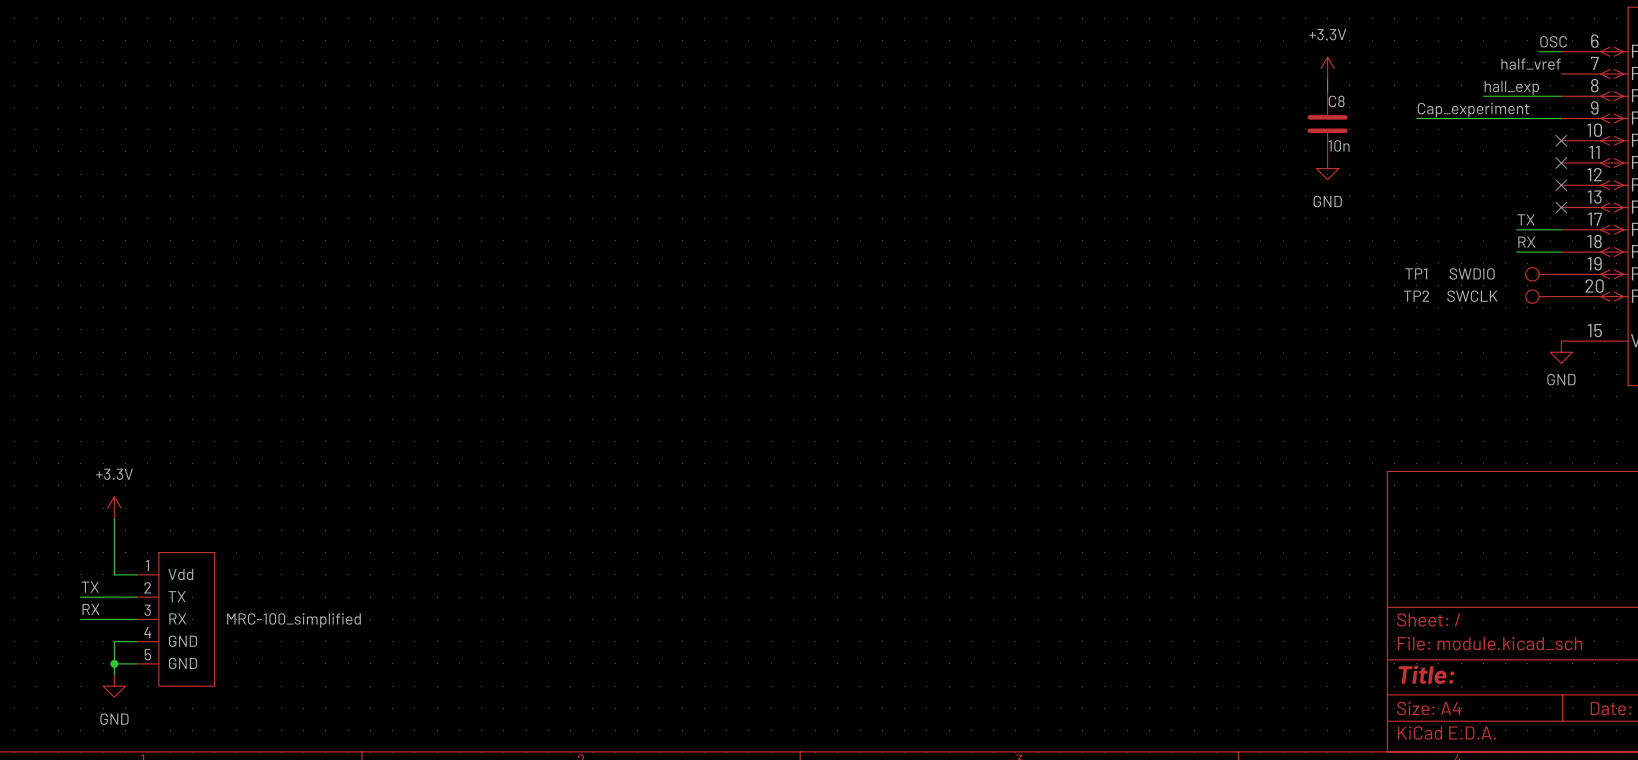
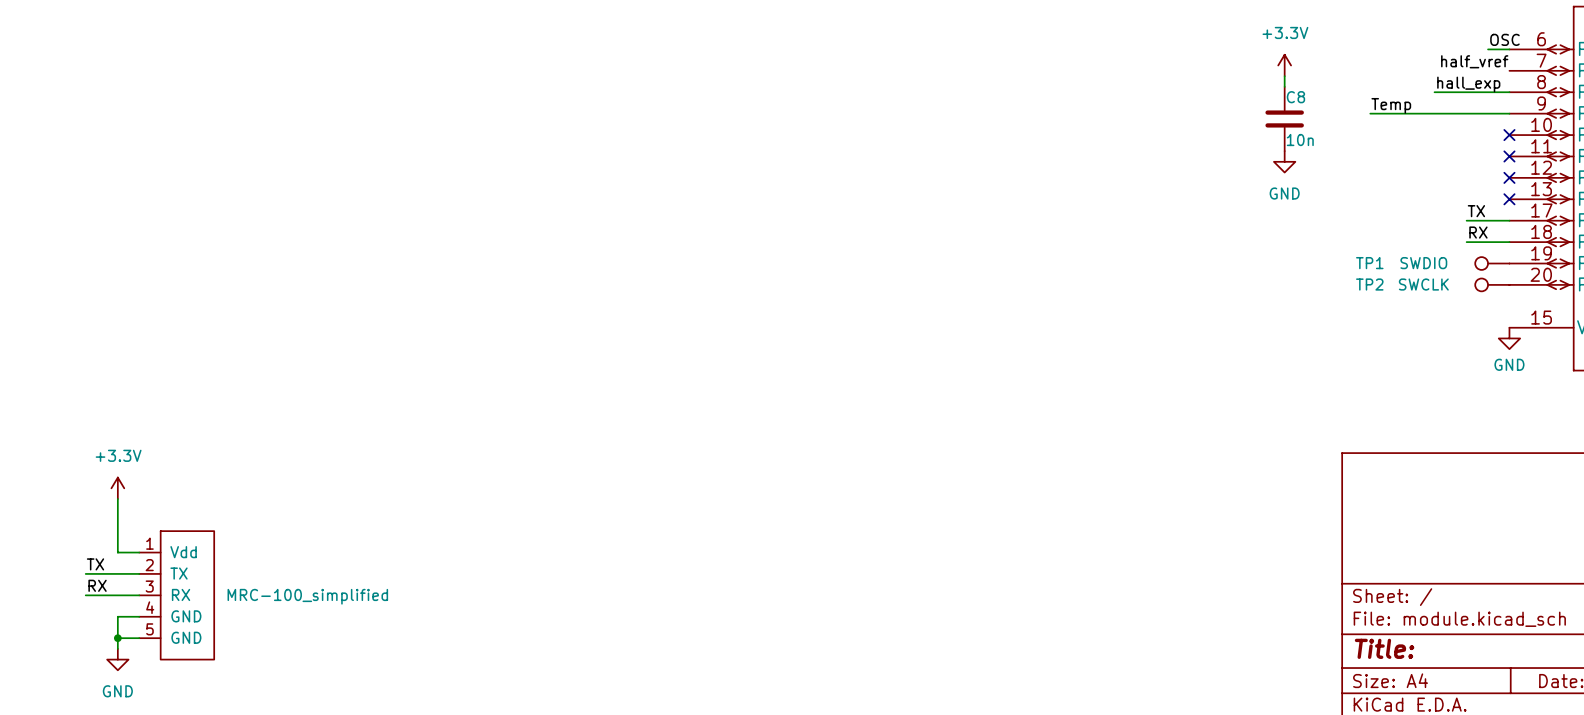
label: Cap_experiment (1473, 110) -> Temp (1391, 105)

